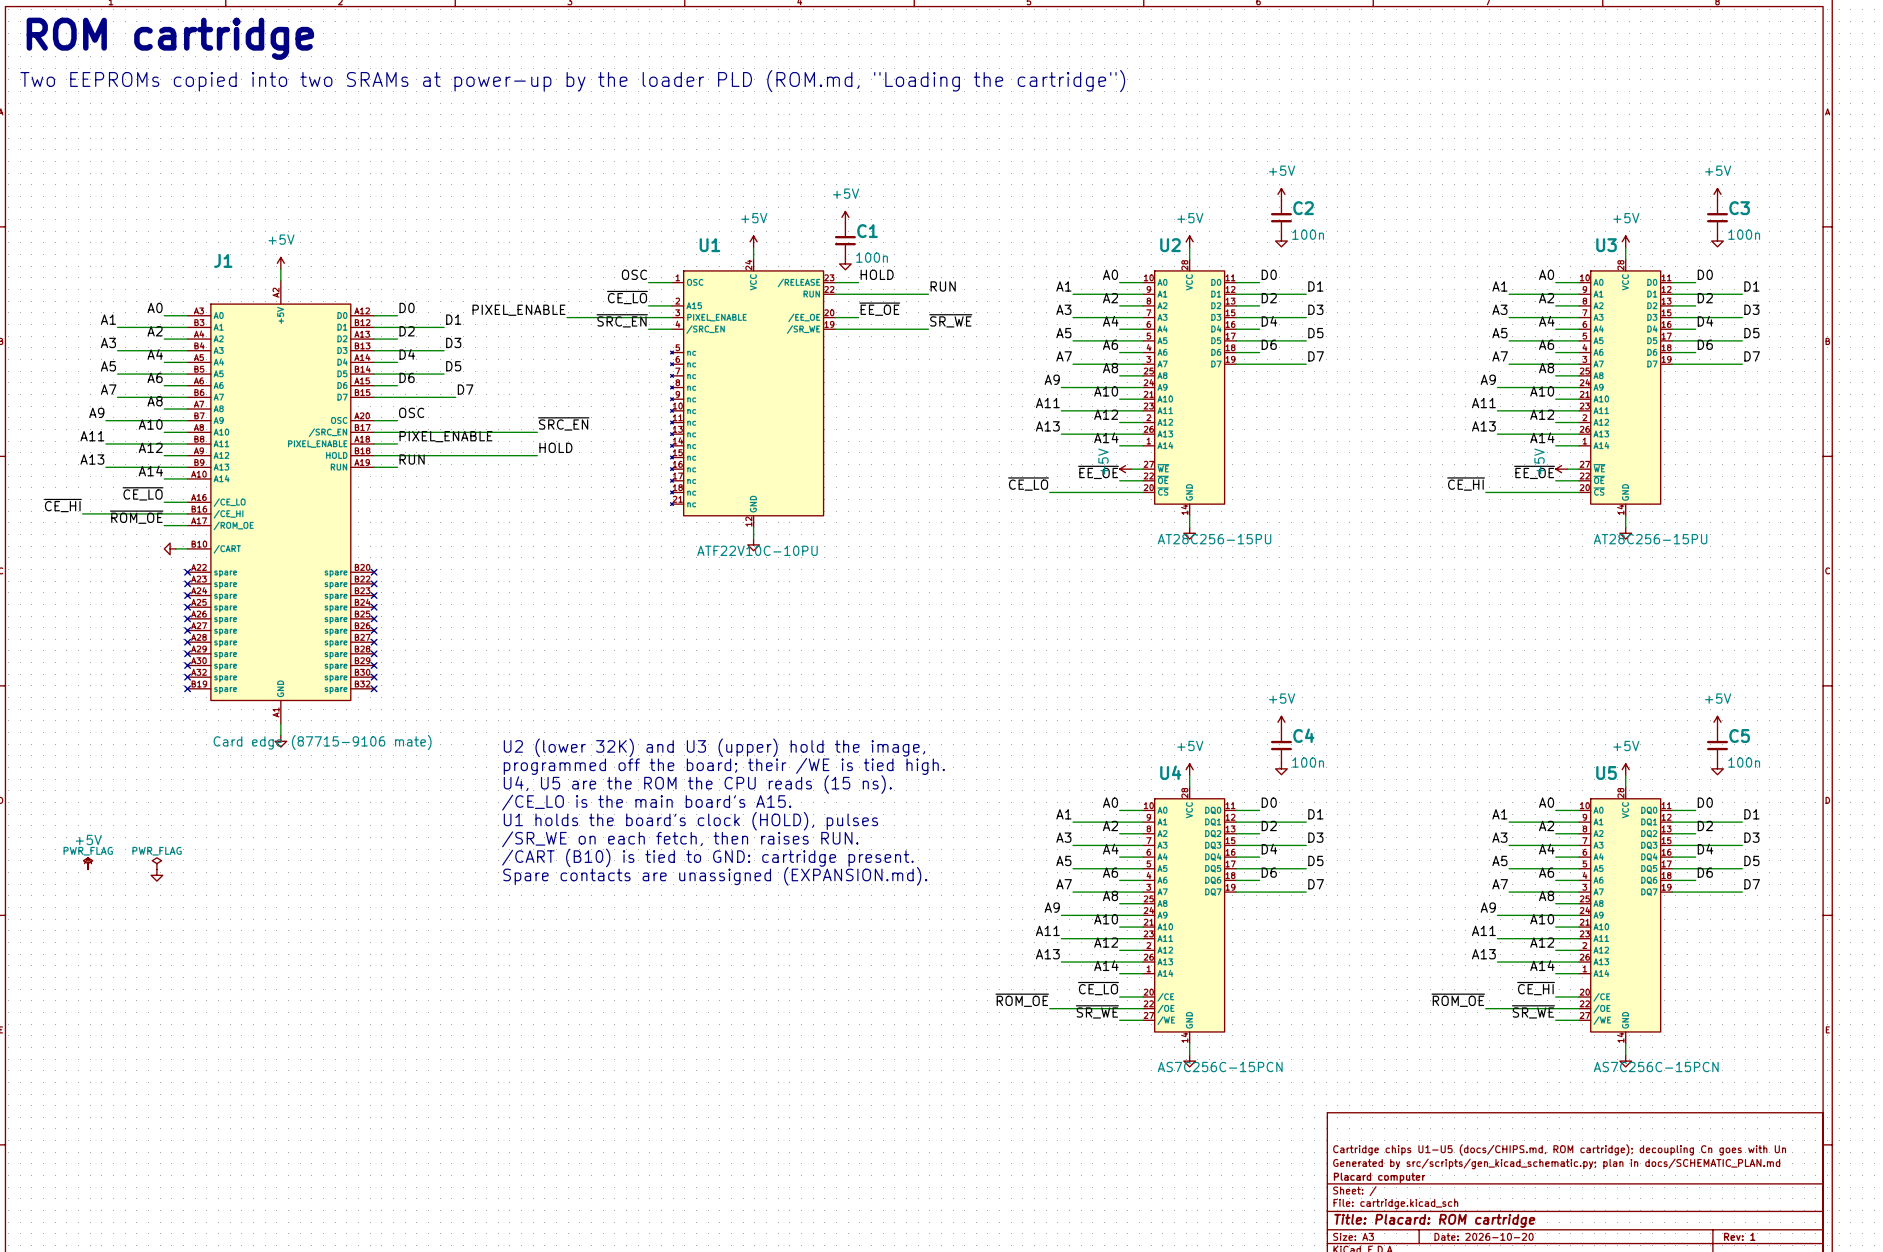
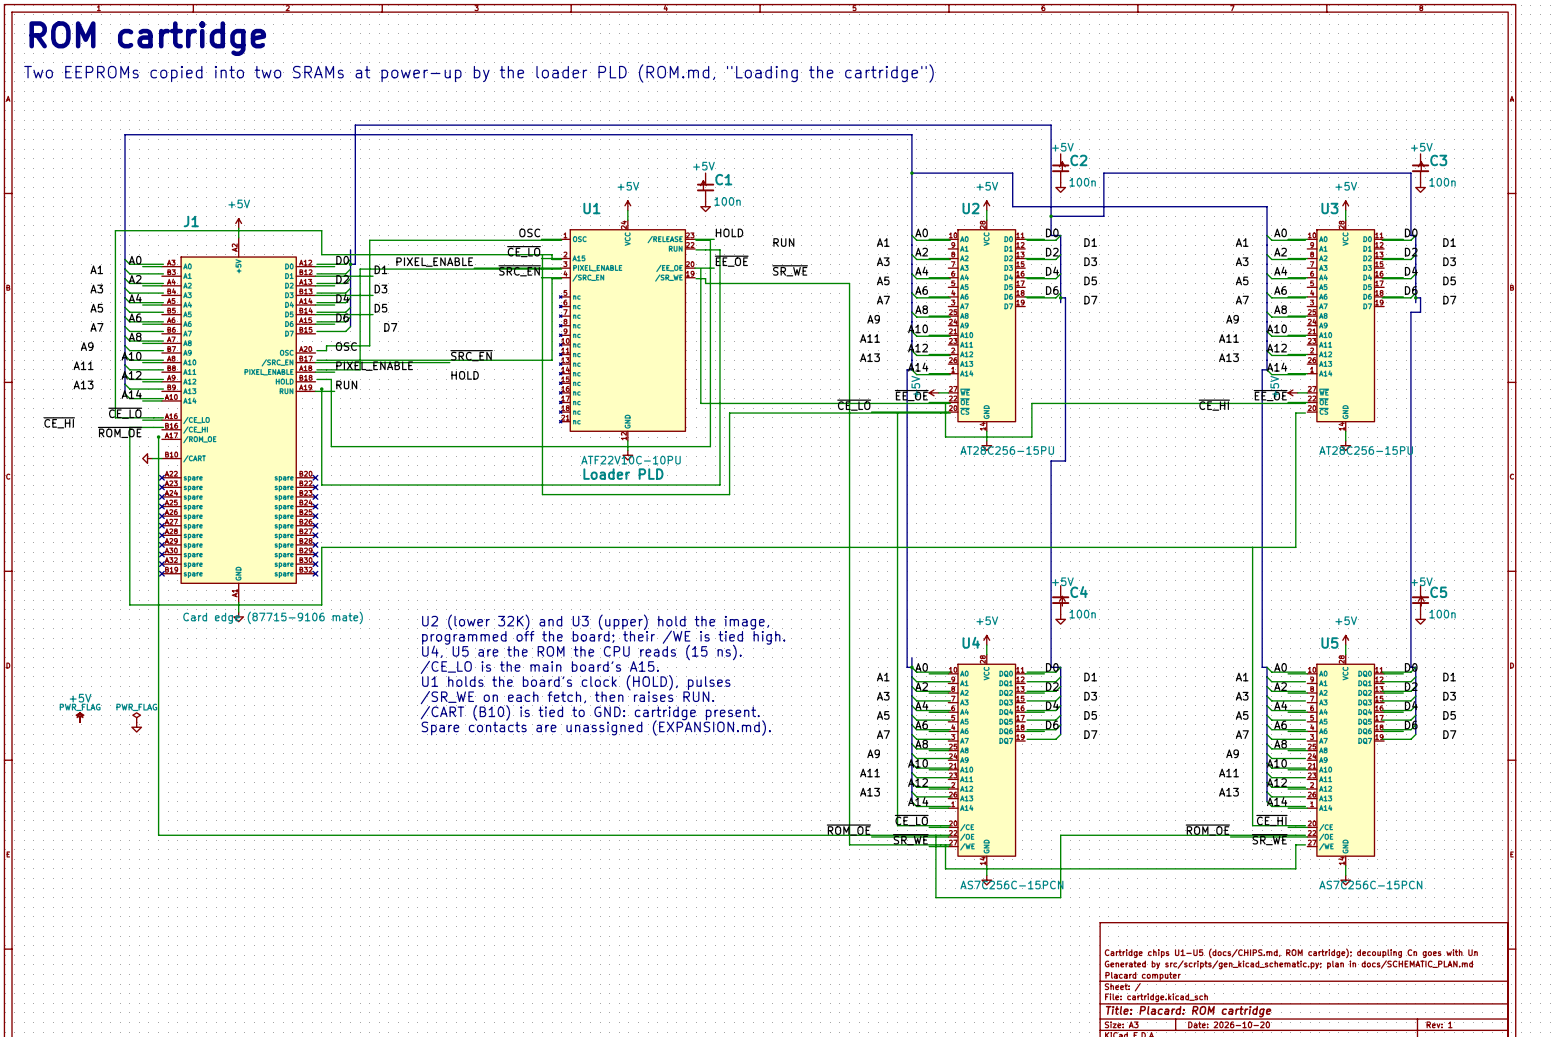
bus: none -> (911, 173) (1012, 173) (1012, 206) (1267, 206) (1267, 369) (1262, 369) (1262, 667) (1267, 667) (1267, 801)
junction: none -> (911, 173)
C2 position: (1281, 217) -> (1060, 168)
C3 position: (1717, 217) -> (1420, 168)
C1 position: (845, 240) -> (705, 187)
power symbol position: (1281, 241) -> (1060, 187)
power symbol position: (1717, 241) -> (1420, 187)
bus: none -> (1051, 216) (1103, 216) (1103, 173) (1410, 173) (1410, 235) (1415, 235) (1415, 302)
junction: none -> (1051, 216)
power symbol position: (845, 263) -> (705, 206)
wire: none -> (911, 235) (916, 240) (950, 240)
wire: none -> (1060, 235) (1055, 240) (1027, 240)
wire: none -> (1267, 235) (1271, 240) (1305, 240)
wire: none -> (1415, 235) (1410, 240) (1382, 240)
wire: none -> (561, 240) (369, 240) (369, 345) (326, 345) (326, 350) (316, 350)
wire: none -> (696, 240) (710, 240) (710, 446) (331, 446) (331, 379) (316, 379)
wire: (835, 294) (928, 294) -> none
wire: (1073, 294) (1143, 294) -> none
wire: (1236, 294) (1306, 294) -> none
wire: (1509, 294) (1579, 294) -> none
wire: (1672, 294) (1742, 294) -> none
bus: none -> (350, 249) (350, 326)
wire: none -> (696, 249) (719, 249) (719, 485) (321, 485) (321, 389)
wire: none -> (542, 254) (542, 494) (729, 494) (729, 413) (950, 413)
wire: none -> (911, 254) (916, 259) (950, 259)
wire: none -> (1060, 254) (1055, 259) (1027, 259)
wire: none -> (1267, 254) (1271, 259) (1305, 259)
wire: none -> (1415, 254) (1410, 259) (1382, 259)
wire: none -> (125, 259) (129, 264) (163, 264)
wire: none -> (350, 259) (345, 264) (316, 264)
wire: none -> (561, 259) (552, 259) (552, 254) (321, 254) (321, 230) (115, 230) (115, 417) (163, 417)
bus: none -> (350, 264) (355, 264) (355, 125) (1051, 125) (1051, 235) (1060, 235) (1060, 302)
junction: none -> (350, 264)
wire: (1073, 317) (1143, 317) -> none
wire: (1236, 317) (1306, 317) -> none
wire: (1509, 317) (1579, 317) -> none
wire: (1672, 317) (1742, 317) -> none
wire: none -> (125, 269) (129, 273) (163, 273)
wire: none -> (350, 269) (345, 273) (316, 273)
wire: none -> (561, 269) (360, 269) (360, 369) (316, 369)
wire: none -> (700, 269) (700, 403) (950, 403)
wire: none -> (911, 273) (916, 278) (950, 278)
wire: none -> (1060, 273) (1055, 278) (1027, 278)
wire: none -> (1267, 273) (1271, 278) (1305, 278)
wire: none -> (1415, 273) (1410, 278) (1382, 278)
wire: (117, 327) (187, 327) -> none
wire: (835, 329) (928, 329) -> none
wire: none -> (125, 278) (129, 283) (163, 283)
wire: none -> (350, 278) (345, 283) (316, 283)
wire: none -> (561, 278) (552, 278) (552, 360) (316, 360)
wire: none -> (696, 278) (705, 278) (705, 283) (849, 283) (849, 844) (950, 844)
wire: (1073, 340) (1143, 340) -> none
wire: (1236, 340) (1306, 340) -> none
wire: (1509, 340) (1579, 340) -> none
wire: (1672, 340) (1742, 340) -> none
wire: none -> (125, 288) (129, 293) (163, 293)
wire: none -> (350, 288) (345, 293) (316, 293)
wire: none -> (911, 293) (916, 297) (950, 297)
wire: none -> (1060, 293) (1055, 297) (1027, 297)
wire: none -> (1267, 293) (1271, 297) (1305, 297)
wire: none -> (1415, 293) (1410, 297) (1382, 297)
wire: (117, 350) (187, 350) -> none
wire: none -> (125, 297) (129, 302) (163, 302)
wire: none -> (350, 297) (345, 302) (316, 302)
bus: none -> (1060, 297) (1065, 297) (1065, 461) (1051, 461) (1051, 667) (1060, 667) (1060, 734)
junction: none -> (1060, 297)
bus: none -> (1415, 297) (1420, 297) (1420, 312) (1410, 312) (1410, 667) (1415, 667) (1415, 734)
junction: none -> (1415, 297)
wire: (1073, 364) (1143, 364) -> none
wire: (1236, 364) (1306, 364) -> none
wire: (1509, 364) (1579, 364) -> none
wire: (1672, 364) (1742, 364) -> none
wire: none -> (125, 307) (129, 312) (163, 312)
wire: none -> (350, 307) (345, 312) (316, 312)
wire: none -> (911, 312) (916, 317) (950, 317)
wire: none -> (1267, 312) (1271, 317) (1305, 317)
wire: (117, 374) (187, 374) -> none
wire: none -> (125, 317) (129, 321) (163, 321)
wire: none -> (350, 317) (345, 321) (316, 321)
wire: (1061, 387) (1143, 387) -> none
wire: (1497, 387) (1579, 387) -> none
wire: none -> (125, 326) (129, 331) (163, 331)
wire: none -> (350, 326) (345, 331) (316, 331)
wire: none -> (911, 331) (916, 336) (950, 336)
wire: none -> (1267, 331) (1271, 336) (1305, 336)
wire: (117, 397) (187, 397) -> none
wire: (374, 397) (455, 397) -> none
wire: none -> (125, 336) (129, 341) (163, 341)
wire: (1061, 410) (1143, 410) -> none
wire: (1497, 410) (1579, 410) -> none
wire: none -> (125, 345) (129, 350) (163, 350)
wire: none -> (911, 350) (916, 355) (950, 355)
wire: none -> (1267, 350) (1271, 355) (1305, 355)
wire: (105, 420) (187, 420) -> none
wire: (374, 420) (397, 420) -> none
wire: none -> (125, 355) (129, 360) (163, 360)
wire: (1061, 434) (1143, 434) -> none
wire: (1497, 434) (1579, 434) -> none
wire: none -> (125, 365) (129, 369) (163, 369)
wire: none -> (911, 369) (916, 374) (950, 374)
wire: none -> (1267, 369) (1271, 374) (1305, 374)
wire: (105, 443) (187, 443) -> none
wire: none -> (125, 374) (129, 379) (163, 379)
wire: (374, 455) (537, 455) -> none
wire: none -> (125, 384) (129, 389) (163, 389)
junction: none -> (321, 389)
wire: (105, 467) (187, 467) -> none
wire: none -> (125, 393) (129, 398) (163, 398)
bus: none -> (125, 393) (125, 134) (911, 134) (911, 369) (907, 369) (907, 667) (911, 667)
wire: none -> (945, 403) (945, 437) (1031, 437) (1031, 403) (1305, 403)
wire: (1485, 492) (1579, 492) -> none
wire: none -> (897, 413) (897, 825) (950, 825)
wire: none -> (1305, 413) (1295, 413) (1295, 547) (321, 547) (321, 604) (129, 604) (129, 427) (163, 427)
wire: (82, 513) (187, 513) -> none
wire: none -> (158, 437) (158, 835) (950, 835)
junction: none -> (158, 437)
wire: (164, 525) (187, 525) -> none
U1 text: none -> Loader PLD (623, 474)
wire: none -> (1252, 547) (1252, 825) (1305, 825)
C4 position: (1281, 745) -> (1060, 600)
C5 position: (1717, 745) -> (1420, 600)
power symbol position: (1281, 768) -> (1060, 619)
power symbol position: (1717, 768) -> (1420, 619)
bus: none -> (911, 657) (911, 801)
wire: none -> (911, 667) (916, 672) (950, 672)
junction: none -> (911, 667)
wire: none -> (1060, 667) (1055, 672) (1027, 672)
wire: none -> (1267, 667) (1271, 672) (1305, 672)
wire: none -> (1415, 667) (1410, 672) (1382, 672)
wire: none -> (911, 676) (916, 681) (950, 681)
wire: none -> (1060, 676) (1055, 681) (1027, 681)
wire: none -> (1267, 676) (1271, 681) (1305, 681)
wire: none -> (1415, 676) (1410, 681) (1382, 681)
wire: (1073, 822) (1143, 822) -> none
wire: (1236, 822) (1306, 822) -> none
wire: (1509, 822) (1579, 822) -> none
wire: (1672, 822) (1742, 822) -> none
wire: none -> (911, 686) (916, 691) (950, 691)
wire: none -> (1060, 686) (1055, 691) (1027, 691)
wire: none -> (1267, 686) (1271, 691) (1305, 691)
wire: none -> (1415, 686) (1410, 691) (1382, 691)
wire: none -> (911, 696) (916, 700) (950, 700)
wire: none -> (1060, 696) (1055, 700) (1027, 700)
wire: none -> (1267, 696) (1271, 700) (1305, 700)
wire: none -> (1415, 696) (1410, 700) (1382, 700)
wire: (1073, 845) (1143, 845) -> none
wire: (1236, 845) (1306, 845) -> none
wire: (1509, 845) (1579, 845) -> none
wire: (1672, 845) (1742, 845) -> none
wire: none -> (911, 705) (916, 710) (950, 710)
wire: none -> (1060, 705) (1055, 710) (1027, 710)
wire: none -> (1267, 705) (1271, 710) (1305, 710)
wire: none -> (1415, 705) (1410, 710) (1382, 710)
wire: none -> (911, 715) (916, 720) (950, 720)
wire: none -> (1060, 715) (1055, 720) (1027, 720)
wire: none -> (1267, 715) (1271, 720) (1305, 720)
wire: none -> (1415, 715) (1410, 720) (1382, 720)
wire: (1073, 868) (1143, 868) -> none
wire: (1236, 868) (1306, 868) -> none
wire: (1509, 868) (1579, 868) -> none
wire: (1672, 868) (1742, 868) -> none
wire: none -> (911, 724) (916, 729) (950, 729)
wire: none -> (1060, 724) (1055, 729) (1027, 729)
wire: none -> (1267, 724) (1271, 729) (1305, 729)
wire: none -> (1415, 724) (1410, 729) (1382, 729)
wire: none -> (911, 734) (916, 739) (950, 739)
wire: none -> (1060, 734) (1055, 739) (1027, 739)
wire: none -> (1267, 734) (1271, 739) (1305, 739)
wire: none -> (1415, 734) (1410, 739) (1382, 739)
wire: (1073, 892) (1143, 892) -> none
wire: (1236, 892) (1306, 892) -> none
wire: (1509, 892) (1579, 892) -> none
wire: (1672, 892) (1742, 892) -> none
wire: none -> (911, 744) (916, 748) (950, 748)
wire: none -> (1267, 744) (1271, 748) (1305, 748)
wire: none -> (911, 753) (916, 758) (950, 758)
wire: none -> (1267, 753) (1271, 758) (1305, 758)
wire: (1061, 915) (1143, 915) -> none
wire: (1497, 915) (1579, 915) -> none
wire: none -> (911, 763) (916, 768) (950, 768)
wire: none -> (1267, 763) (1271, 768) (1305, 768)
wire: none -> (911, 772) (916, 777) (950, 777)
wire: none -> (1267, 772) (1271, 777) (1305, 777)
wire: (1061, 938) (1143, 938) -> none
wire: (1497, 938) (1579, 938) -> none
wire: none -> (911, 782) (916, 787) (950, 787)
wire: none -> (1267, 782) (1271, 787) (1305, 787)
wire: none -> (911, 792) (916, 796) (950, 796)
wire: none -> (1267, 792) (1271, 796) (1305, 796)
wire: (1061, 962) (1143, 962) -> none
wire: (1497, 962) (1579, 962) -> none
wire: none -> (911, 801) (916, 806) (950, 806)
wire: none -> (1267, 801) (1271, 806) (1305, 806)
wire: none -> (935, 835) (935, 897) (1060, 897) (1060, 835) (1305, 835)
wire: none -> (945, 844) (945, 868) (1295, 868) (1295, 844) (1305, 844)
wire: (1555, 1020) (1579, 1020) -> none

